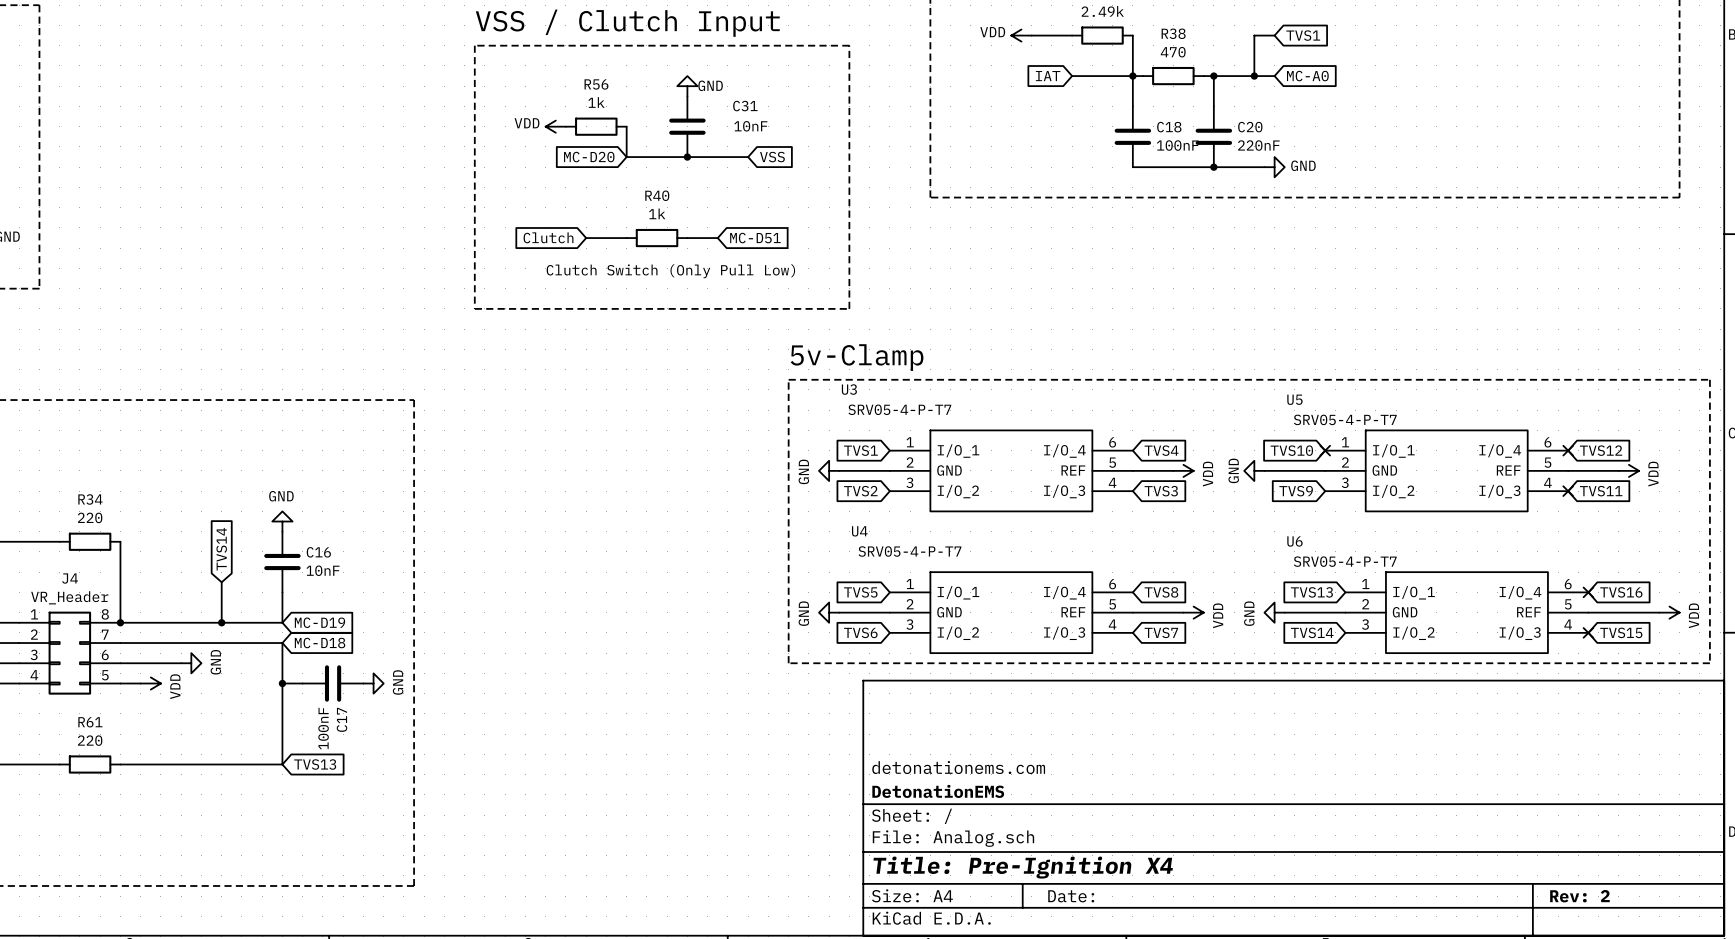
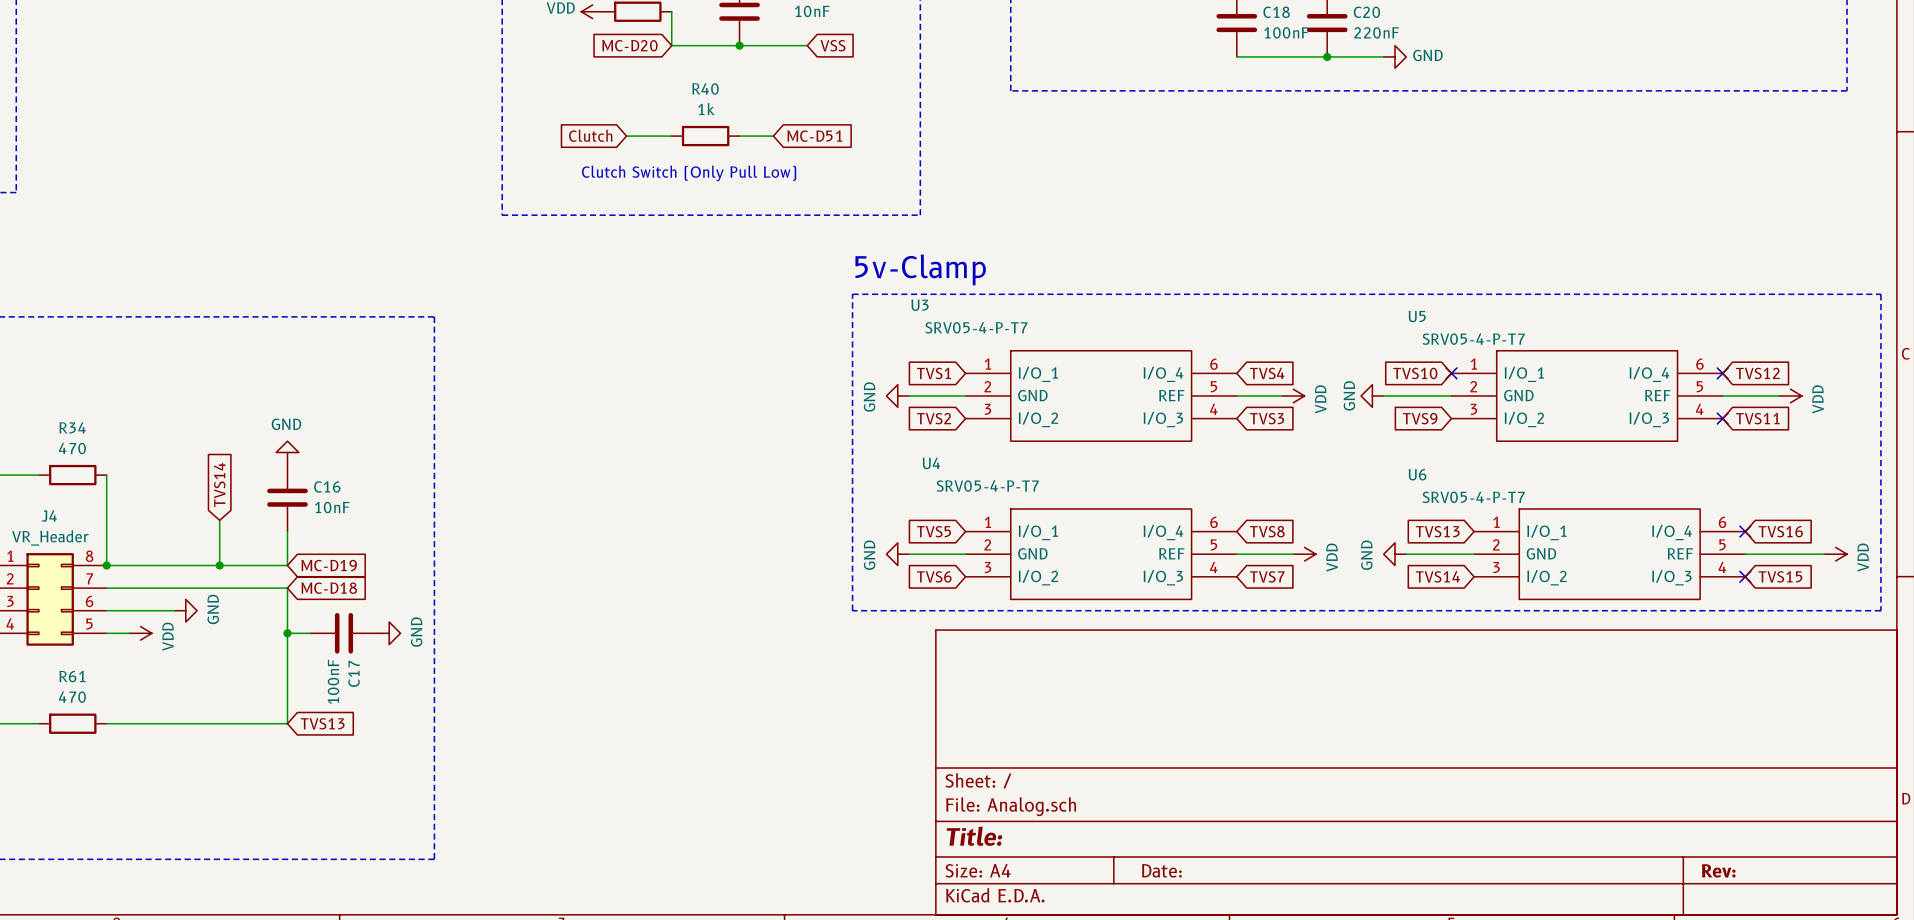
R34 value: 220 (90, 517) -> 470 (72, 448)
R61 value: 220 (90, 740) -> 470 (72, 697)
title block: detonationems.com (958, 767) -> none
title block: DetonationEMS (938, 791) -> none
title block: Title: Pre-Ignition X4 (1023, 867) -> Title: (974, 836)
title block: Rev: 2 (1579, 896) -> Rev: (1718, 870)

